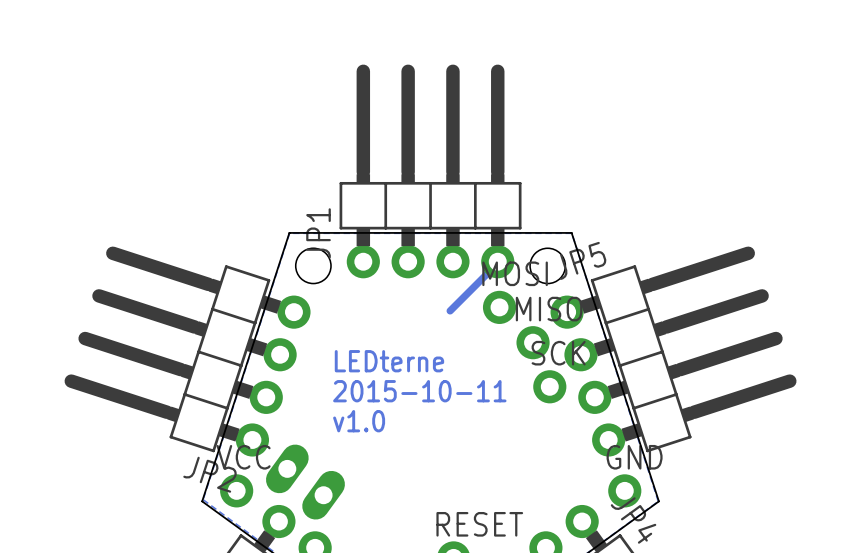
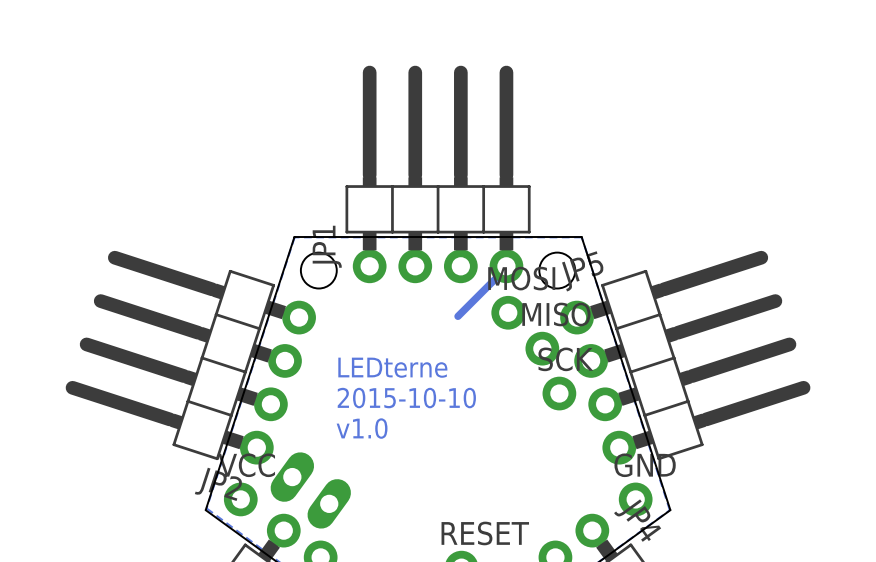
text: 2015-10-11 (419, 391) -> 2015-10-10 (406, 398)

